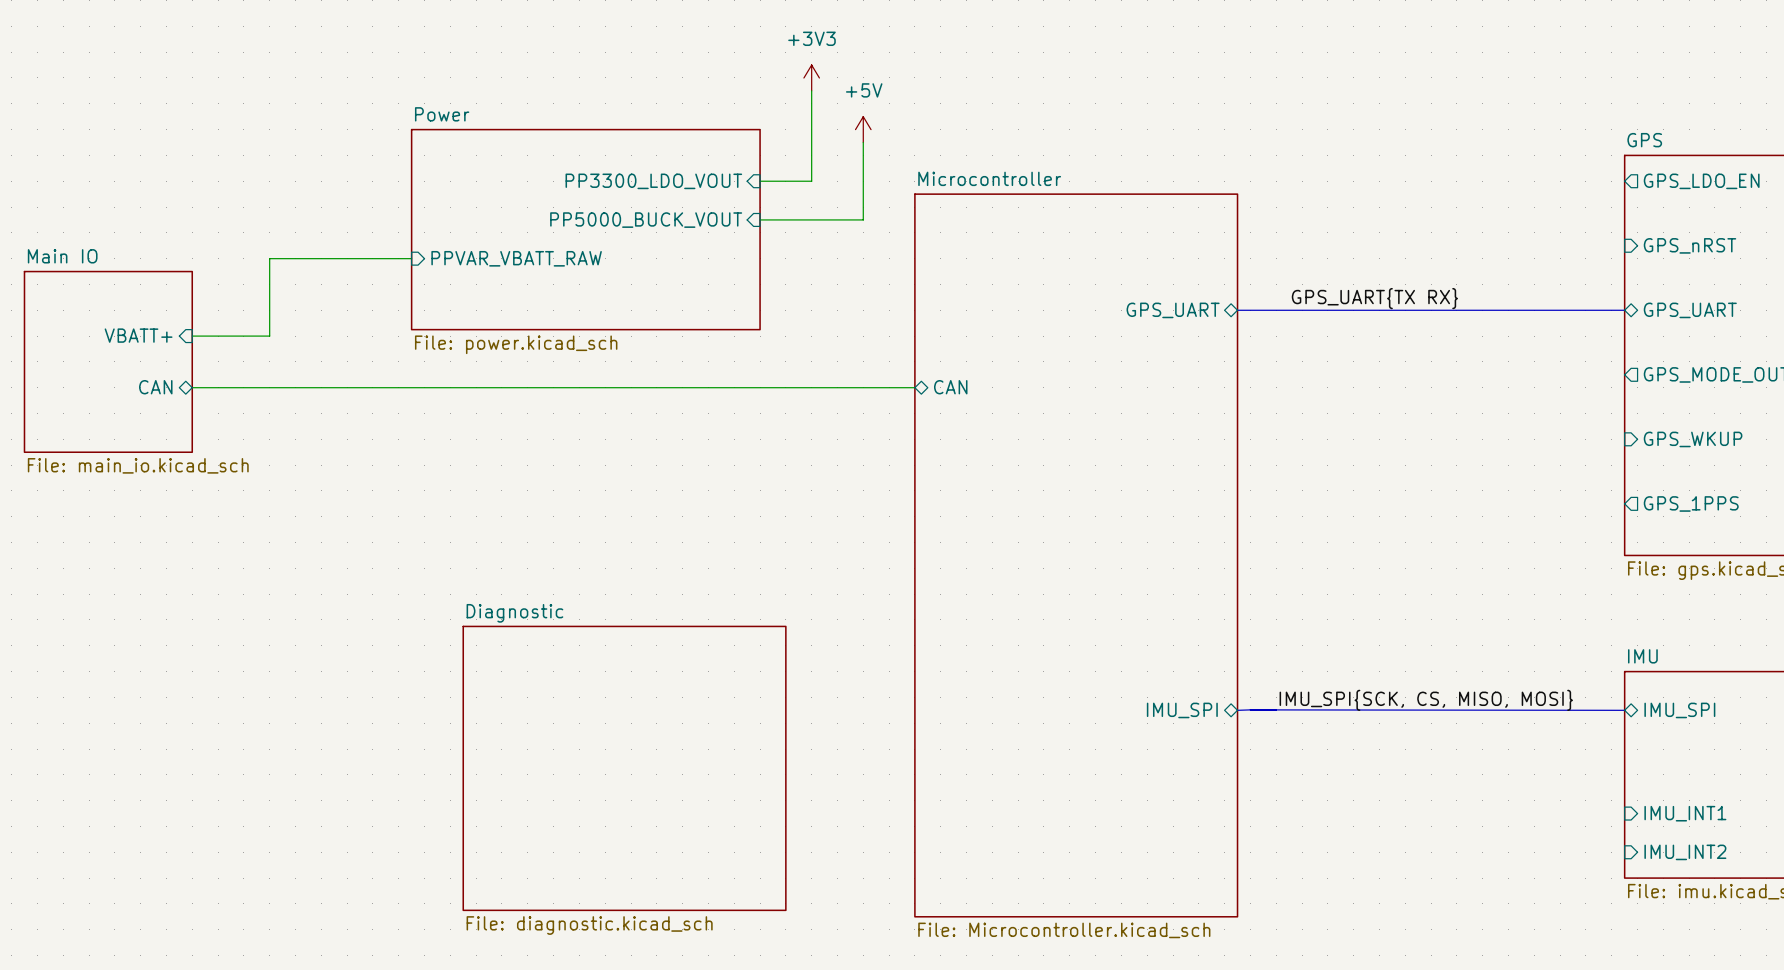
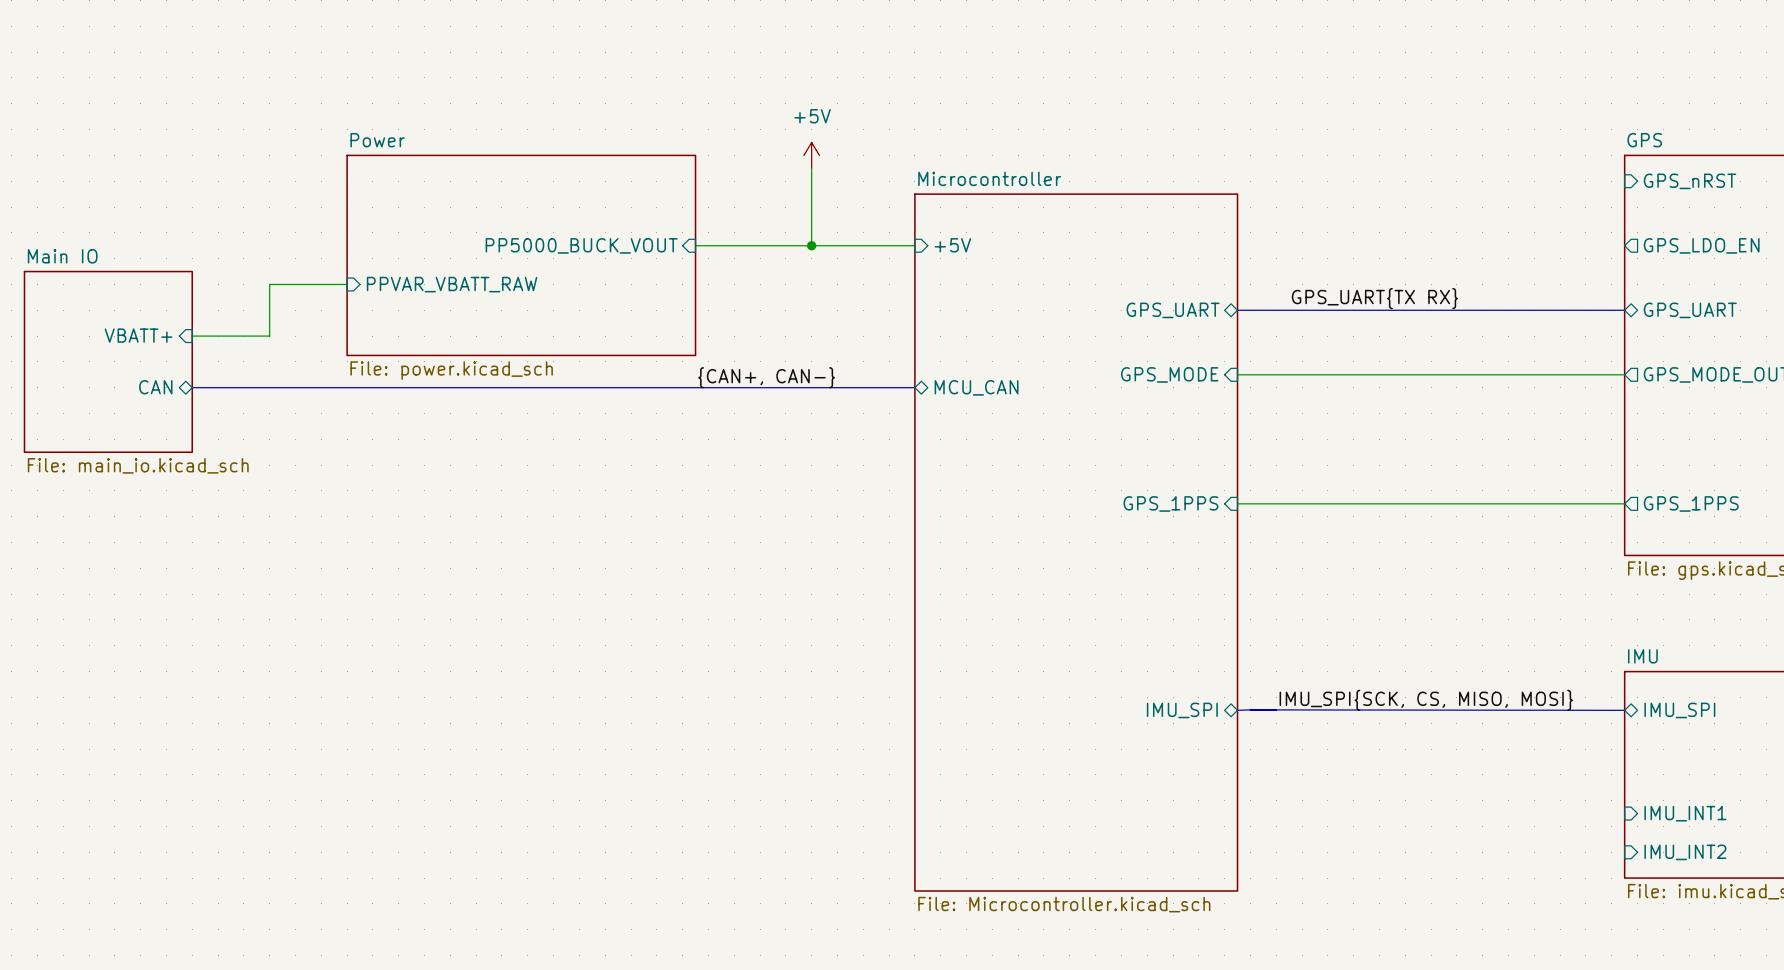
power symbol: +3V3 (811, 77) -> none
wire: (811, 90) (811, 168) -> none
power symbol position: +5V (863, 129) -> +5V (811, 155)
wire: (863, 142) (863, 219) (760, 219) -> none
sheet pin: PP3300_LDO_VOUT (653, 181) -> none
wire: (760, 181) (811, 181) -> (811, 245) (811, 181)
sheet pin shape: output (1701, 181) -> input (1690, 181)
sheet pin: GPS_LDO_EN (1701, 181) -> GPS_nRST (1690, 181)
sheet pin position: PP5000_BUCK_VOUT (646, 220) -> PP5000_BUCK_VOUT (581, 245)
sheet Power position: (585, 229) -> (521, 255)
wire: none -> (695, 245) (914, 245)
junction: none -> (811, 245)
sheet pin: none -> +5V (952, 245)
sheet pin shape: input (1690, 245) -> output (1701, 245)
sheet pin: GPS_nRST (1690, 245) -> GPS_LDO_EN (1701, 245)
wire: (411, 258) (269, 258) (269, 284) -> (347, 284) (269, 284)
sheet pin position: PPVAR_VBATT_RAW (516, 258) -> PPVAR_VBATT_RAW (452, 284)
sheet pin: none -> GPS_MODE (1169, 374)
wire: none -> (1237, 374) (1624, 374)
label: none -> {CAN+, CAN-} (766, 377)
bus: none -> (192, 387) (914, 387)
sheet pin: CAN (950, 387) -> MCU_CAN (976, 387)
sheet pin: GPS_WKUP (1693, 439) -> none
sheet pin: none -> GPS_1PPS (1170, 503)
wire: none -> (1237, 503) (1624, 503)
sheet Microcontroller: none -> File: Microcontroller.kicad_sch (1076, 542)
sheet Microcontroller: File: Microcontroller.kicad_sch (1076, 555) -> none
sheet Diagnostic: File: diagnostic.kicad_sch (624, 768) -> none

